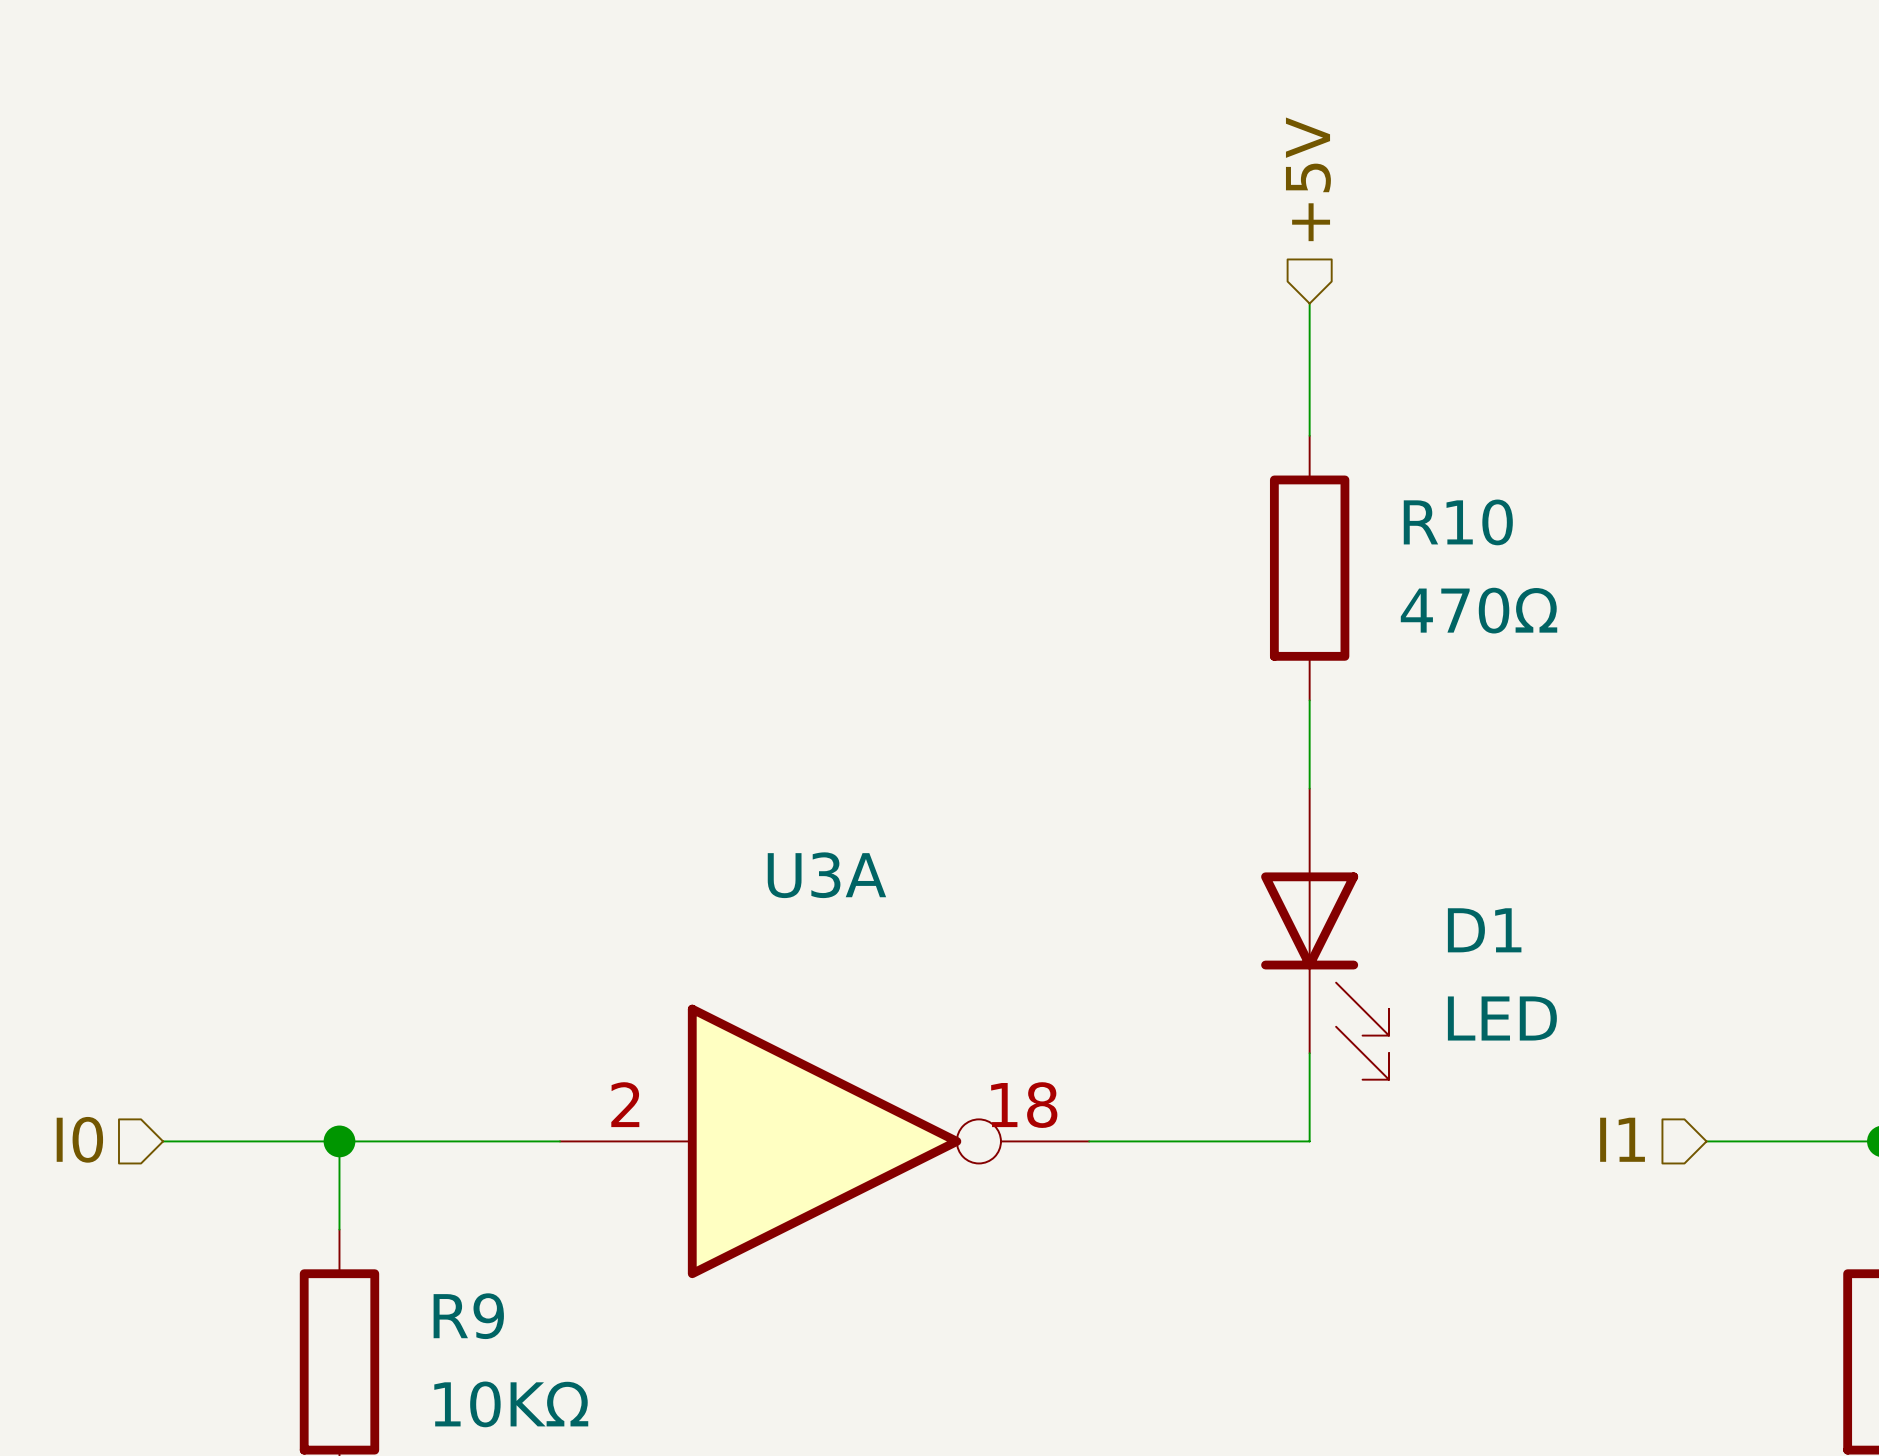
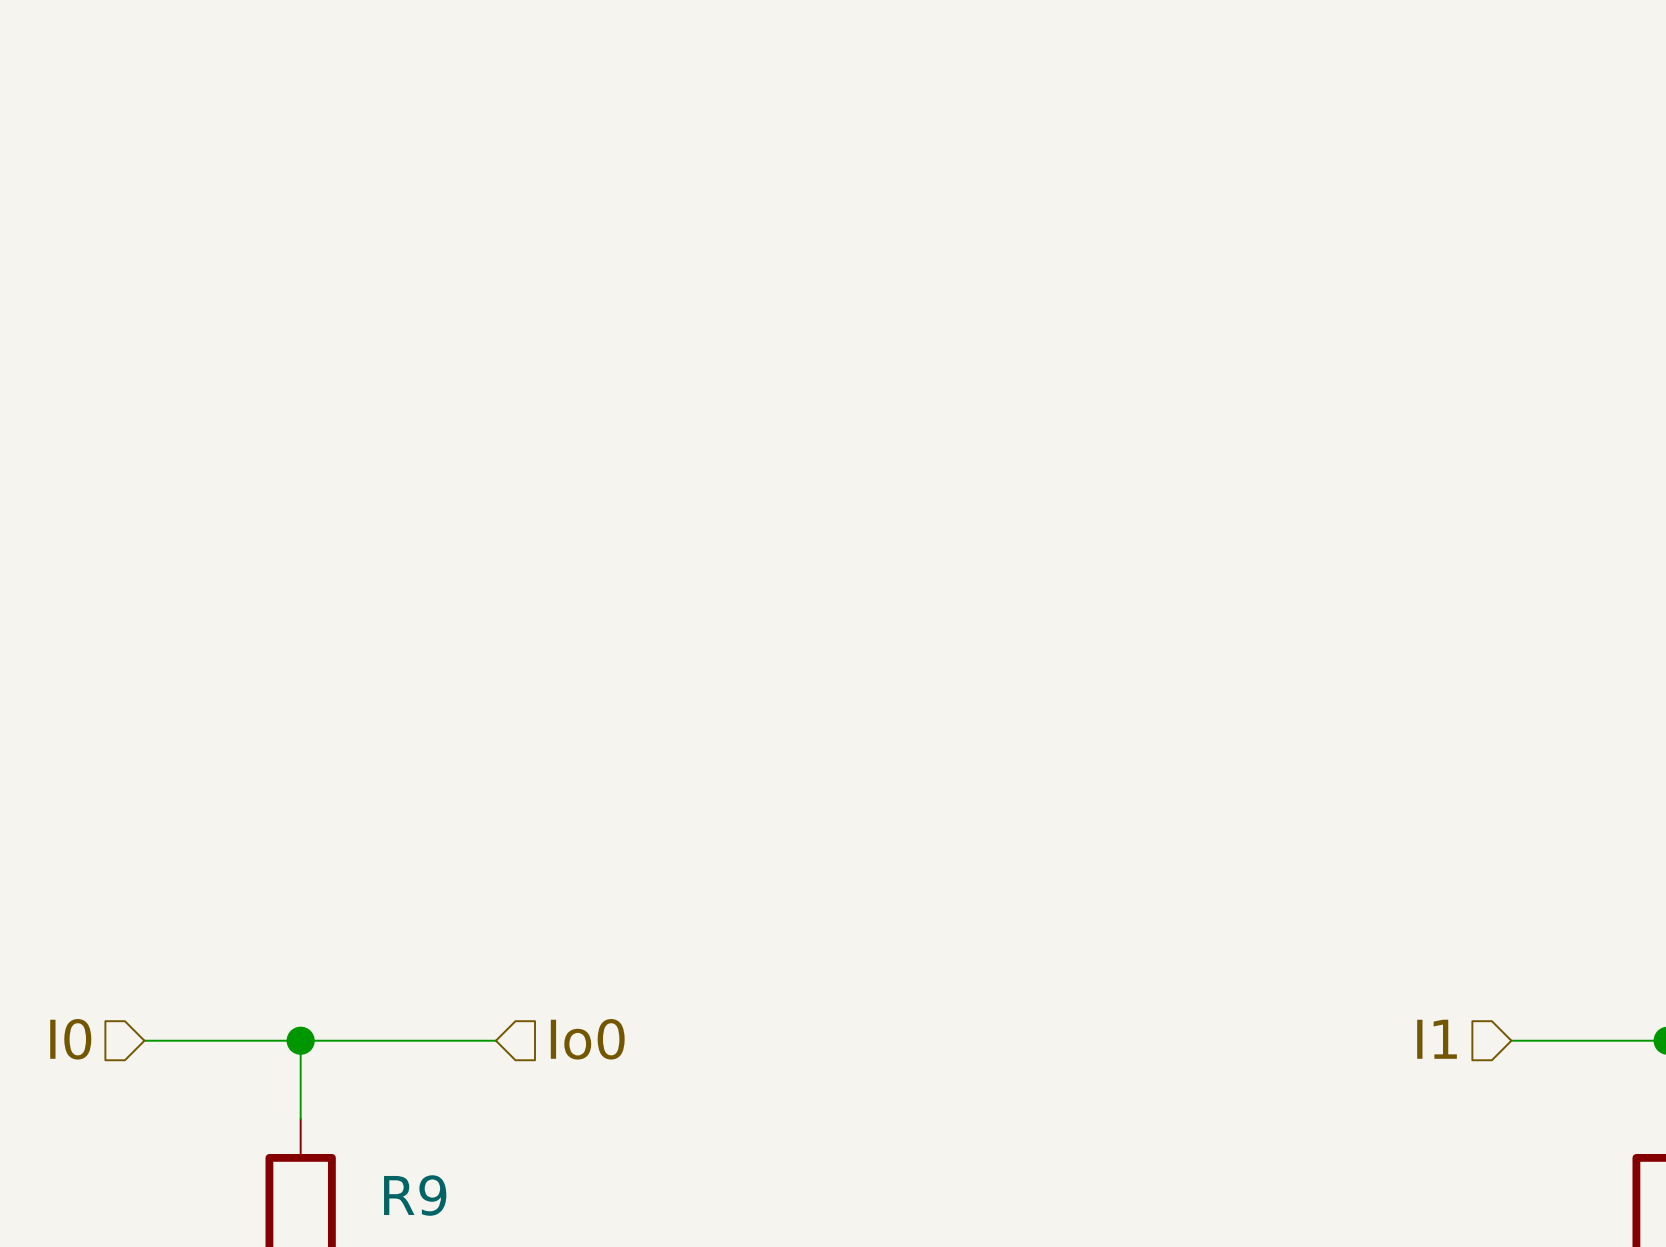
hierarchical label: +5V (1308, 179) -> none
wire: (1309, 303) (1309, 435) -> none
R10: 470Ω (1309, 568) -> none
wire: (1309, 700) (1309, 788) -> none
D1: LED (1325, 934) -> none
wire: (1309, 1053) (1309, 1141) (1089, 1141) -> none
hierarchical label: none -> Io0 (587, 1039)
U3A: (824, 1141) -> none

